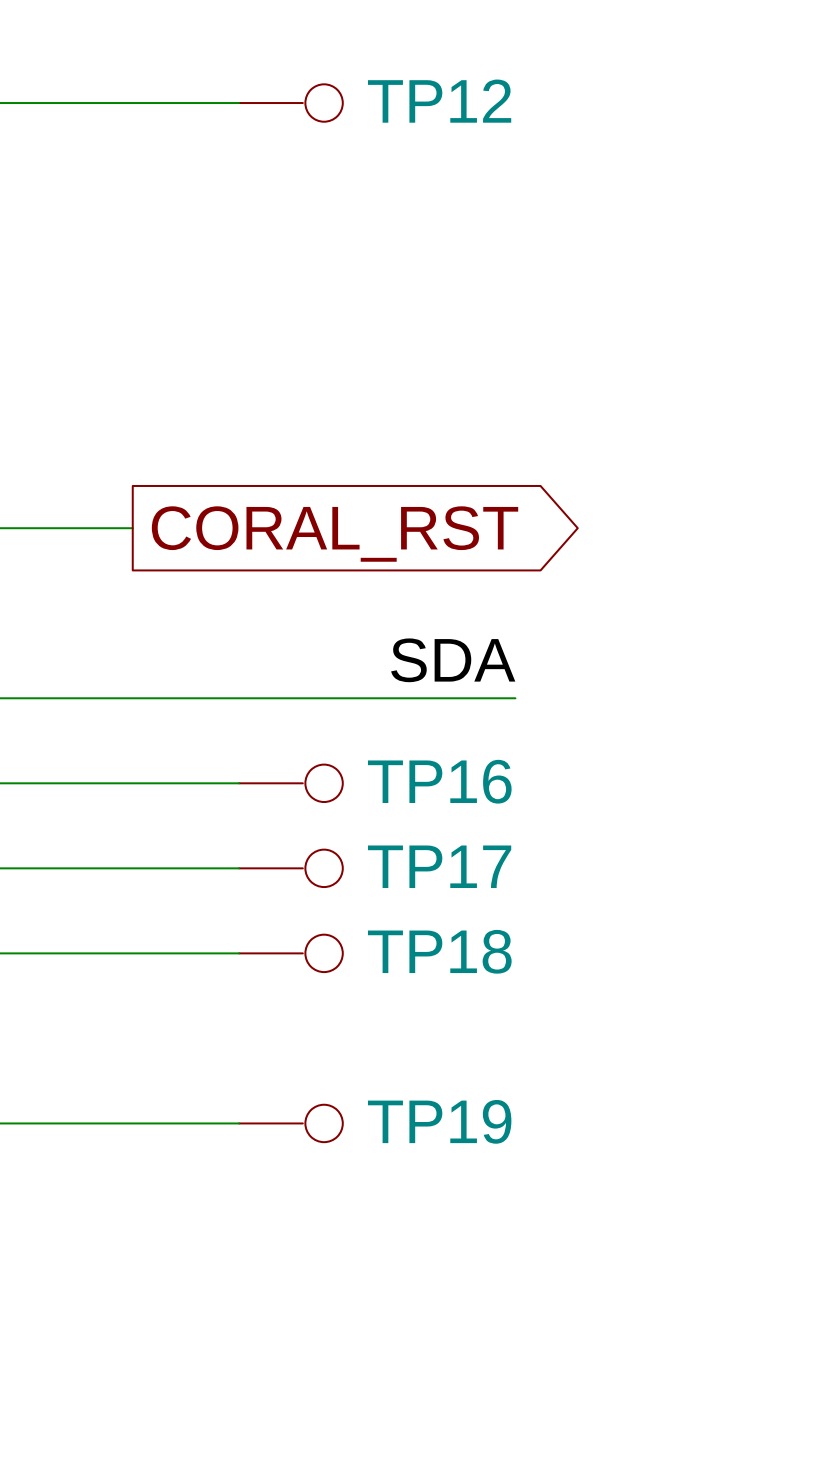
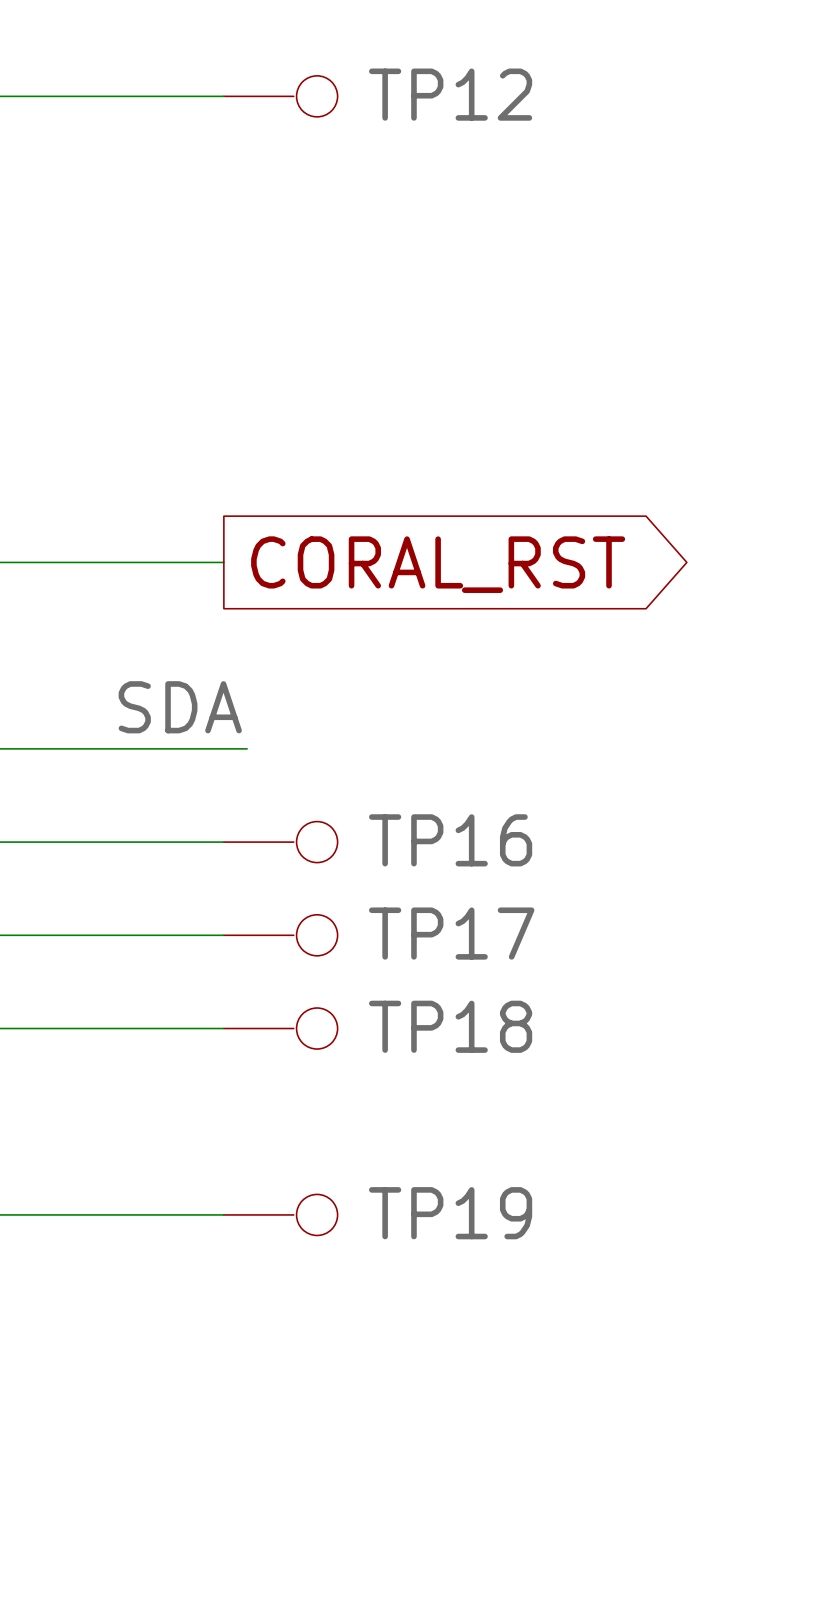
wire: none -> (107, 562) (223, 562)
global label position: CORAL_RST (335, 534) -> CORAL_RST (438, 564)
label position: SDA (453, 660) -> SDA (180, 707)
wire: (260, 698) (515, 698) -> none

